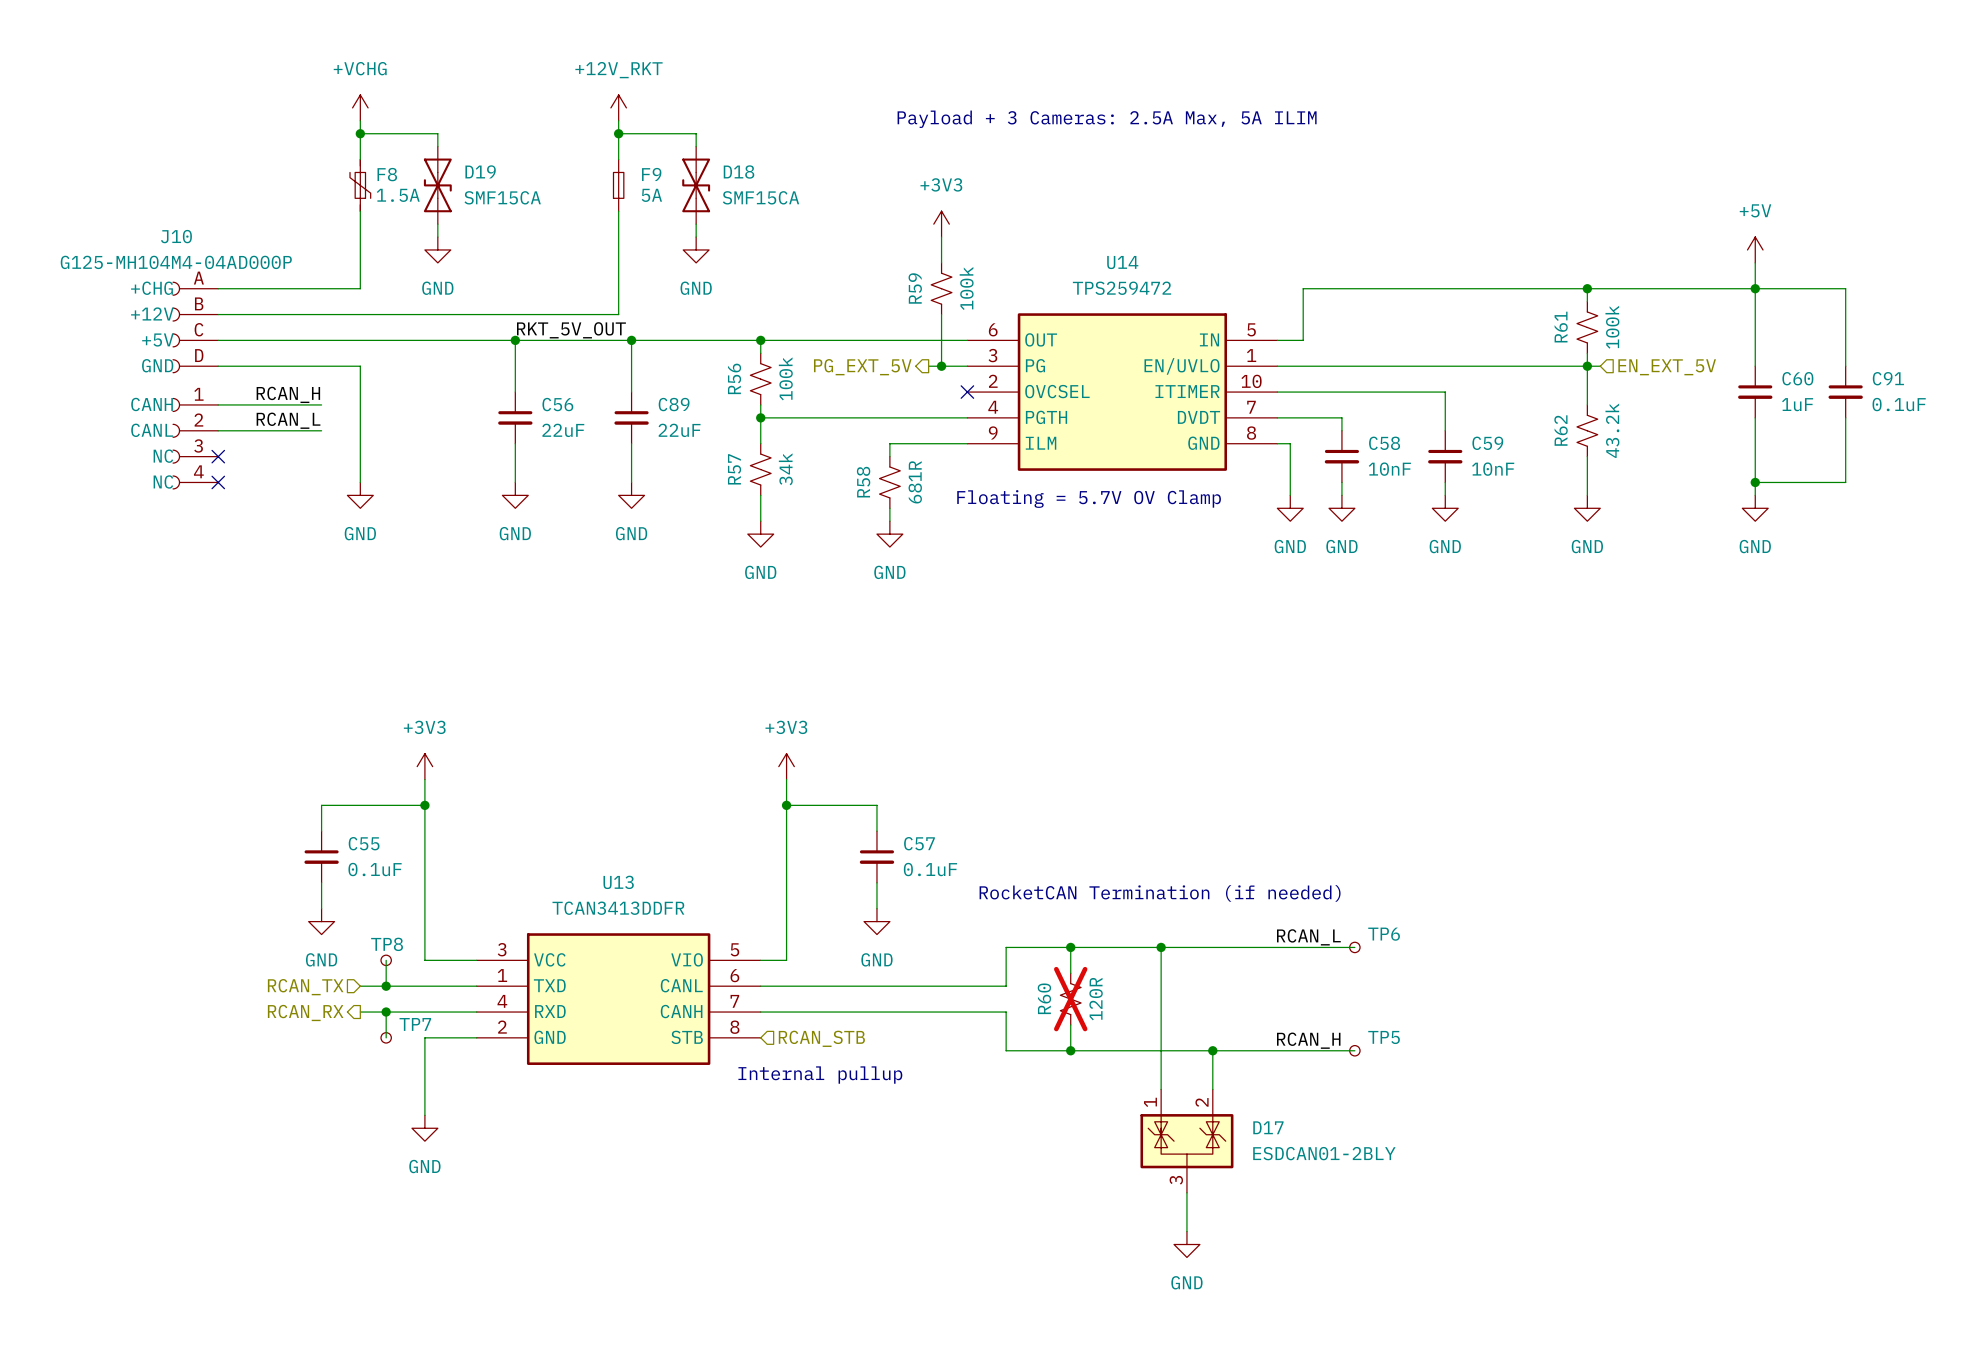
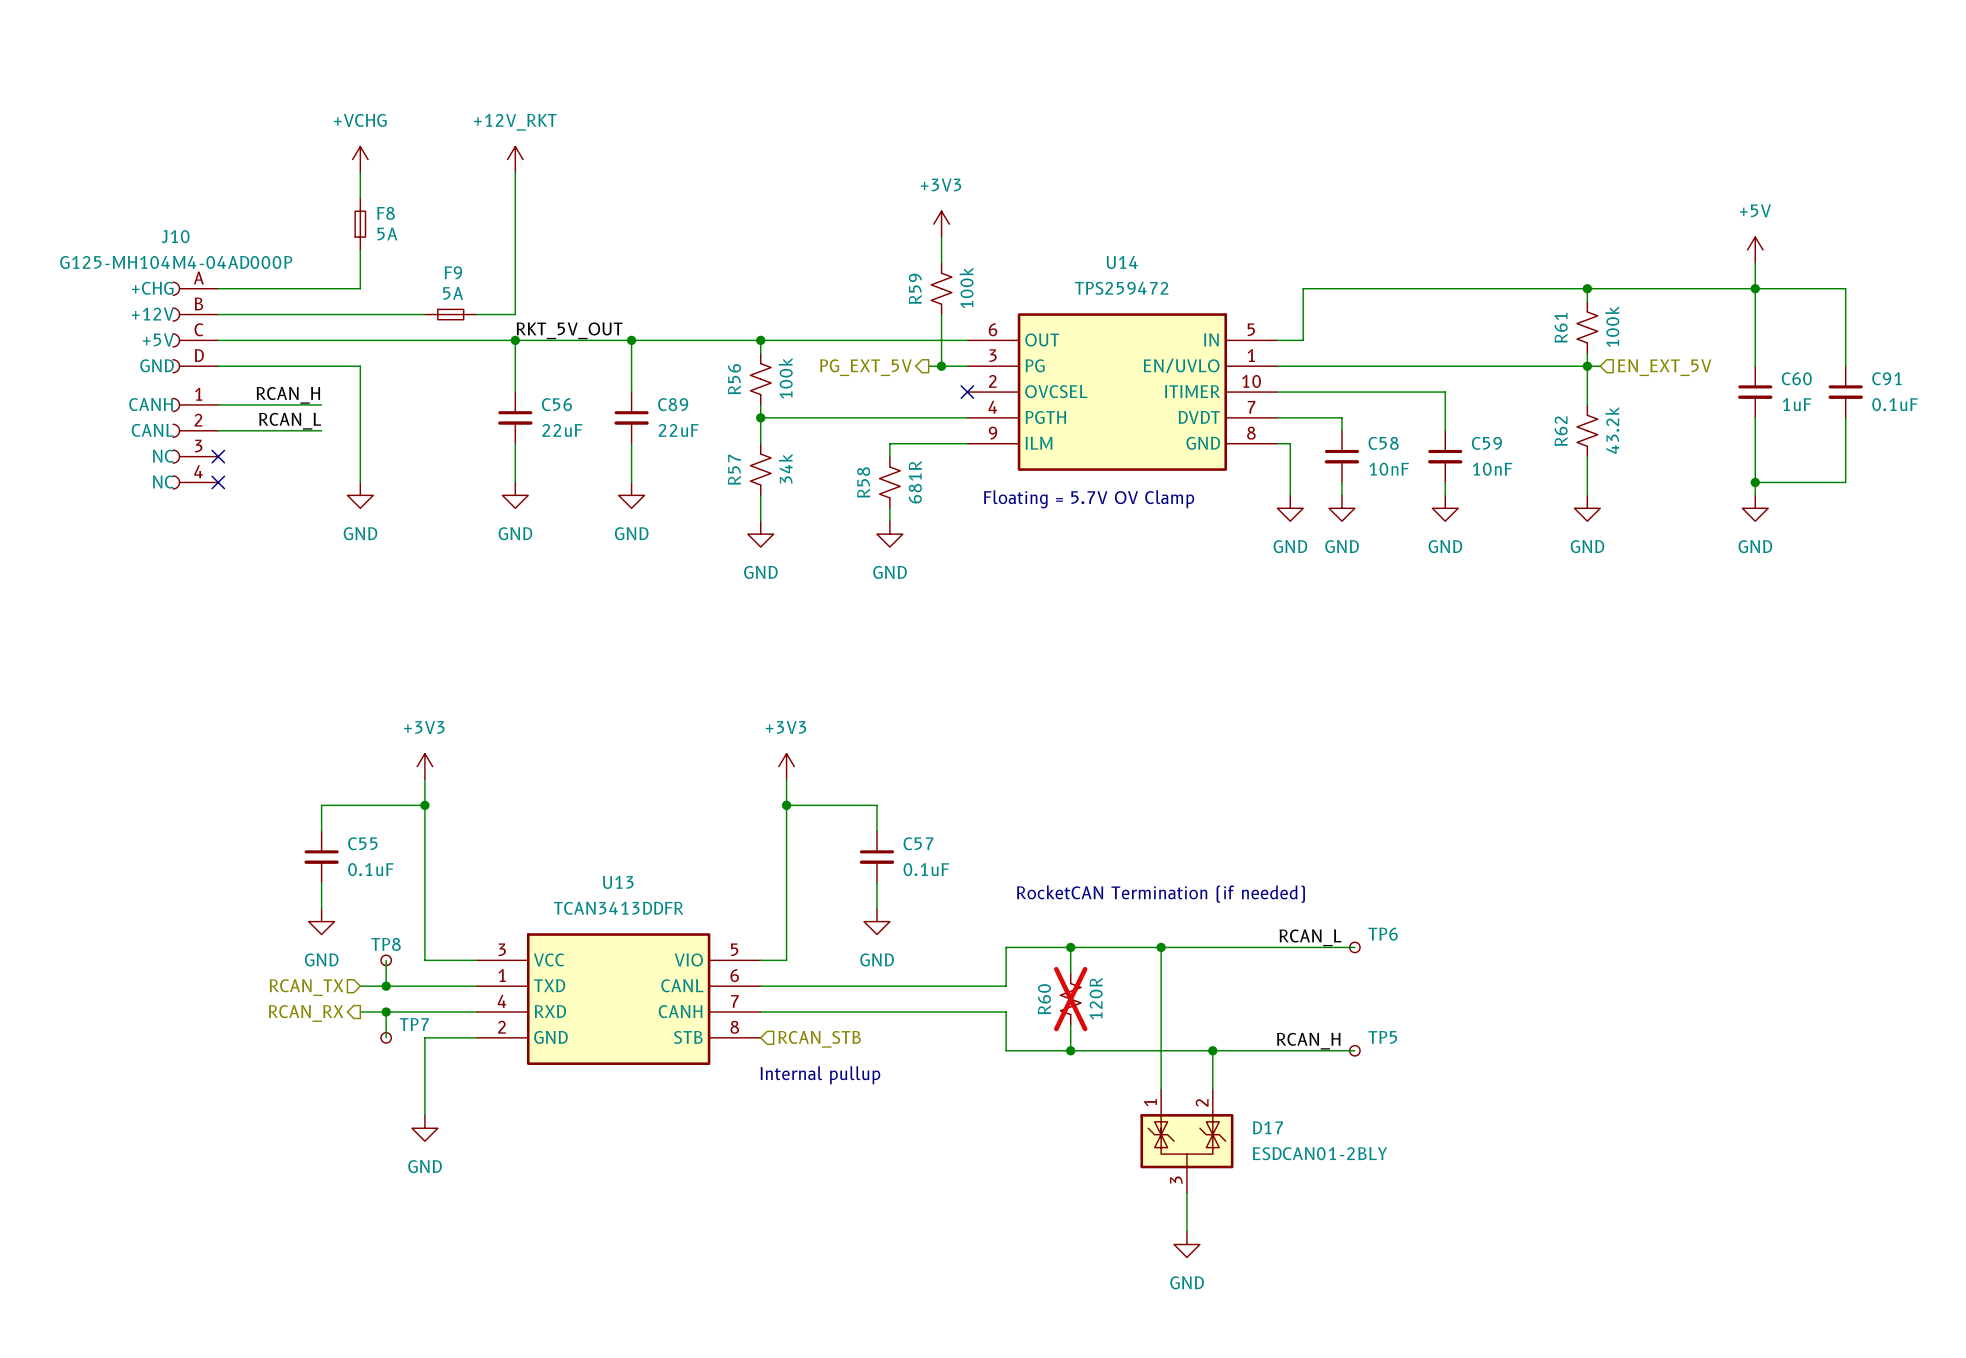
power symbol position: +VCHG (360, 107) -> +VCHG (360, 159)
power symbol position: +12V_RKT (618, 107) -> +12V_RKT (515, 159)
text: Payload + 3 Cameras: 2.5A Max, 5A ILIM (1107, 119) -> none
wire: (360, 120) (360, 159) -> none
wire: (618, 120) (618, 159) -> none
wire: (360, 133) (437, 133) (437, 146) -> none
junction: (360, 133) -> none
wire: (618, 133) (696, 133) (696, 146) -> none
junction: (618, 133) -> none
F8 symbol: [350, 159, 371, 212] -> [355, 198, 366, 250]
F9 name position: F9 (651, 174) -> F9 (453, 272)
D19: SMF15CA (437, 185) -> none
F9 rotation: 0° (618, 185) -> 90° clockwise (450, 314)
F9 position: (618, 185) -> (450, 314)
D18: SMF15CA (696, 185) -> none
F8 value: 1.5A (398, 195) -> 5A (387, 233)
F9 value position: 5A (651, 195) -> 5A (453, 293)
wire: (618, 211) (618, 314) (515, 314) -> (515, 172) (515, 314)
wire: (437, 224) (437, 237) -> none
wire: (696, 224) (696, 237) -> none
power symbol: GND (437, 249) -> none
power symbol: GND (696, 249) -> none

